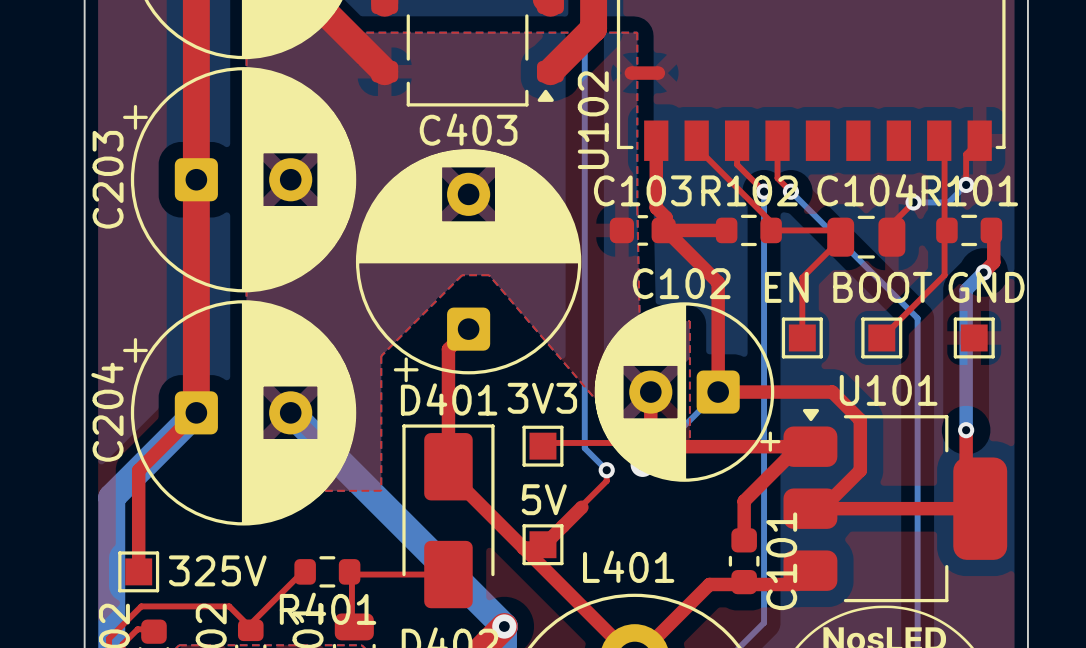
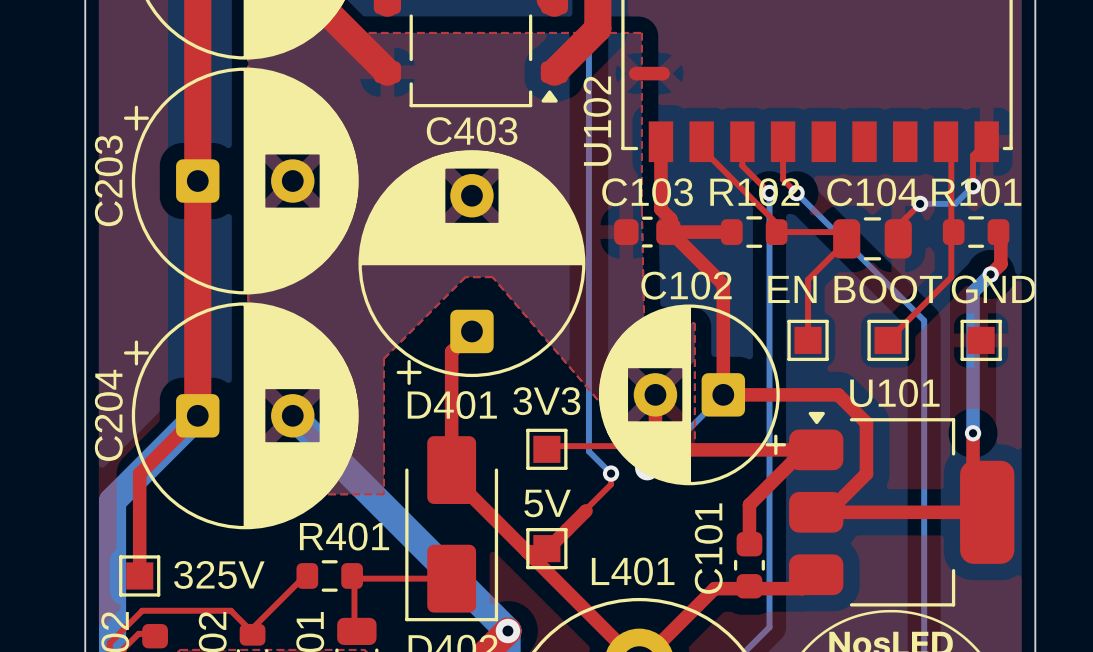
D401 rotation: 0° (448, 516) -> 180° (451, 528)
C101 name position: C101 (781, 561) -> C101 (708, 548)
R401 name position: R401 (328, 608) -> R401 (344, 536)

